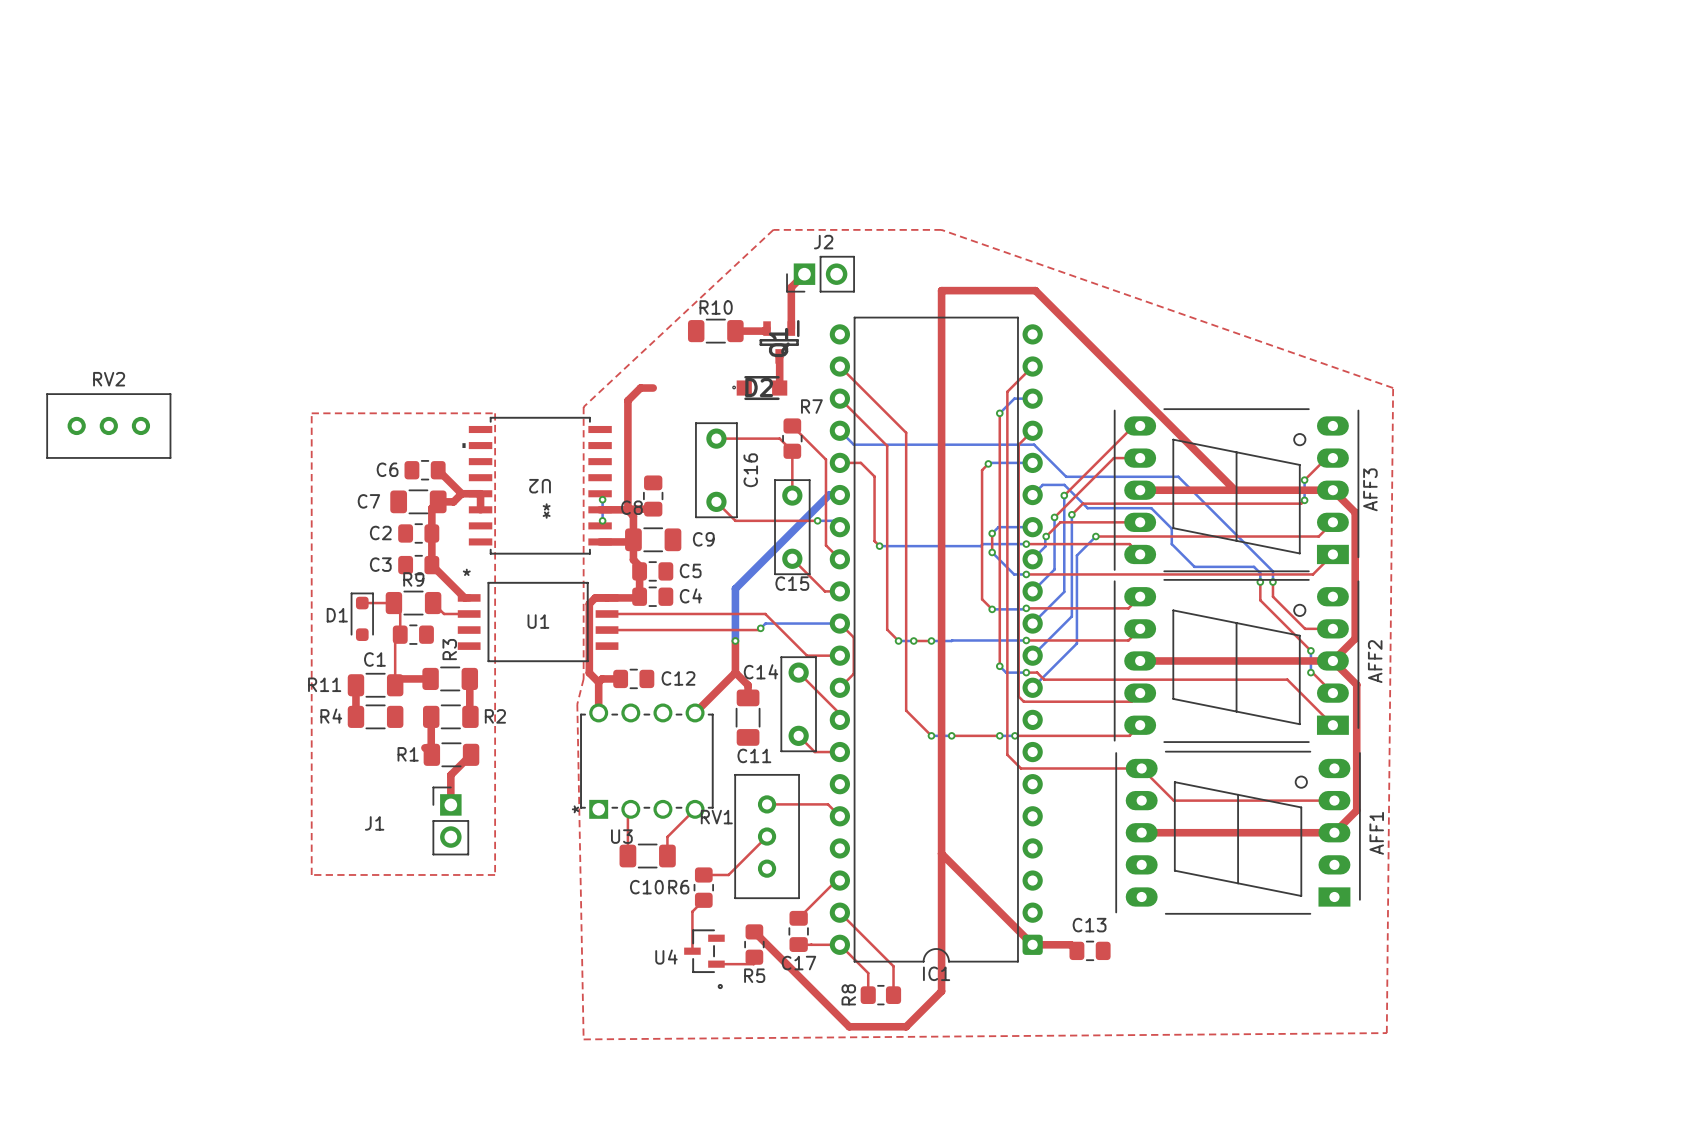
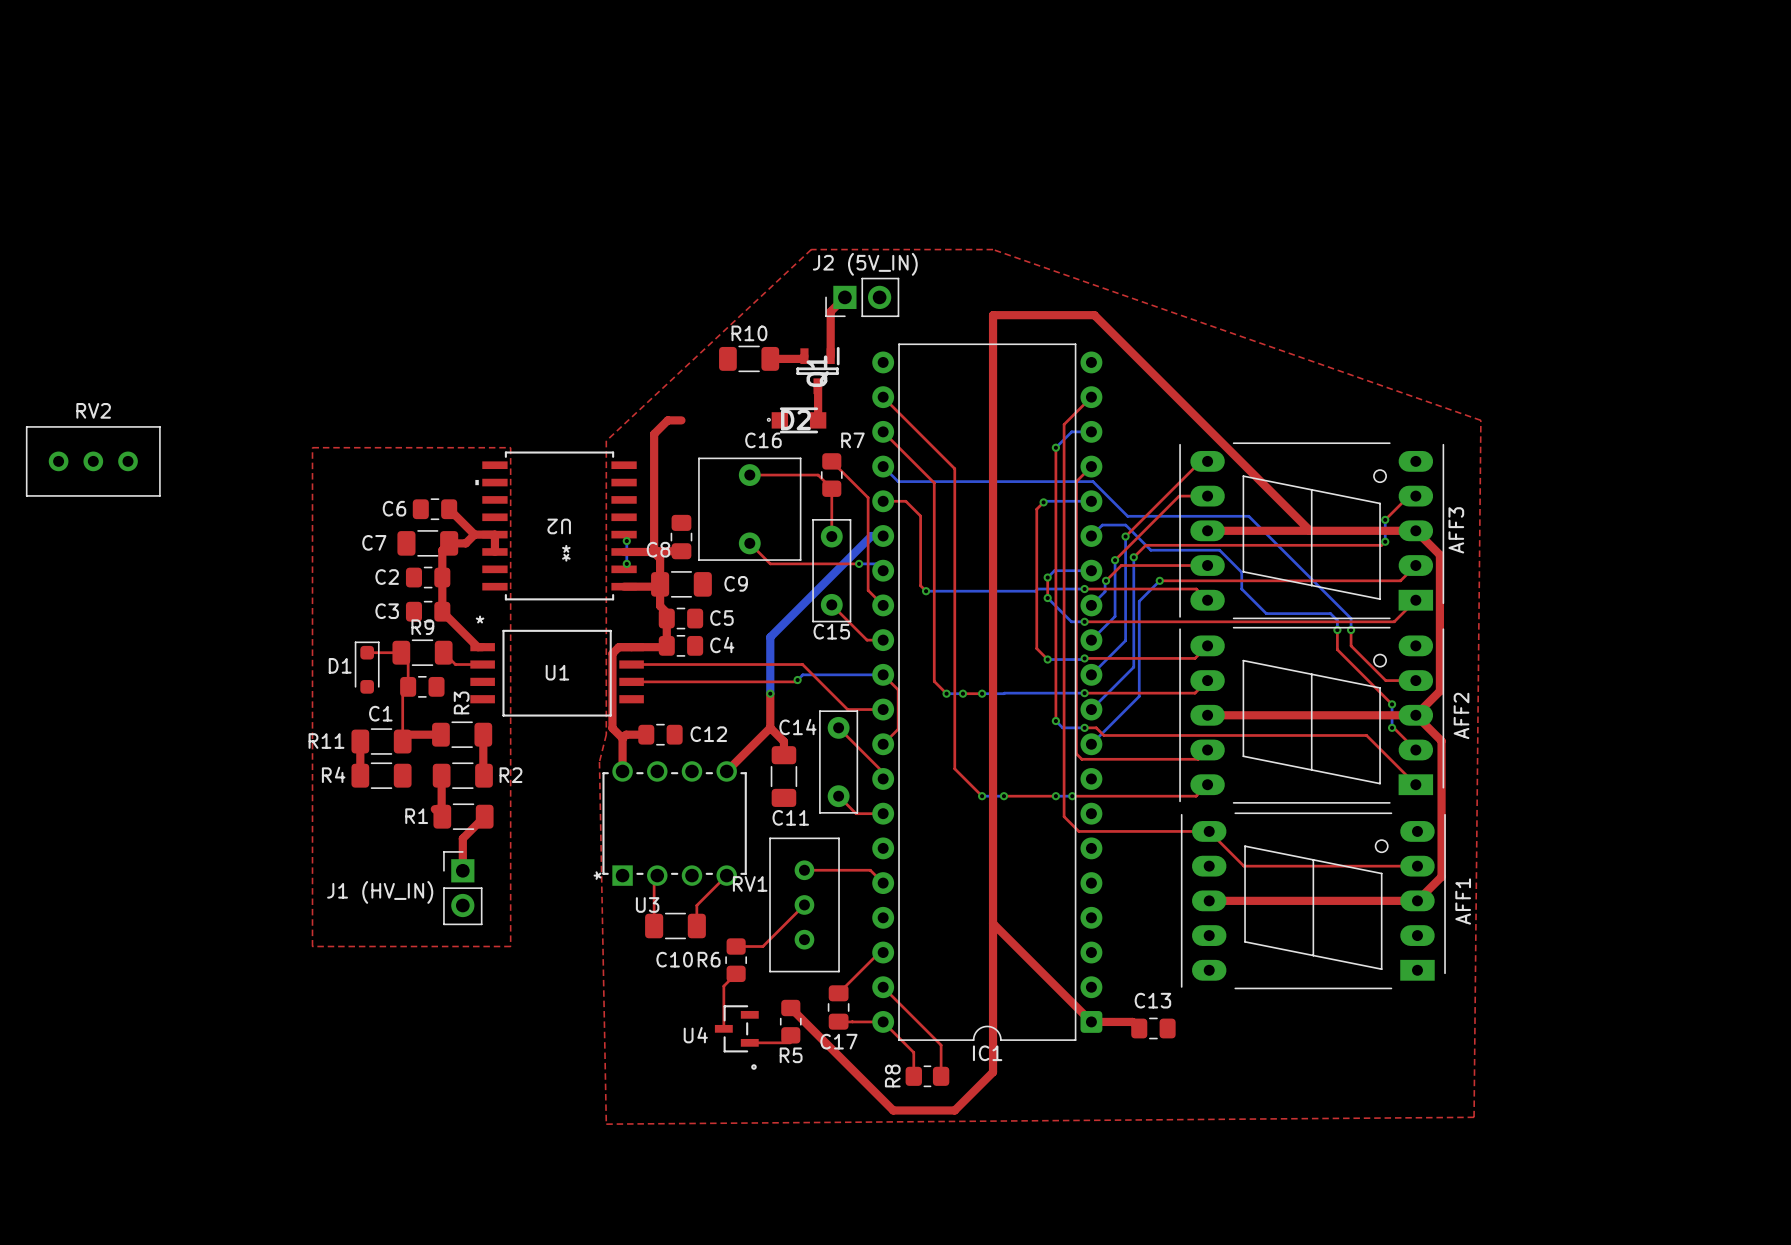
J2 name: J2 (823, 242) -> J2 (5V_IN) (865, 264)
C16 footprint: [695, 422, 738, 519] -> [698, 457, 802, 561]
C16 name position: C16 (750, 470) -> C16 (763, 440)
J1 name: J1 (374, 823) -> J1 (HV_IN) (380, 892)

